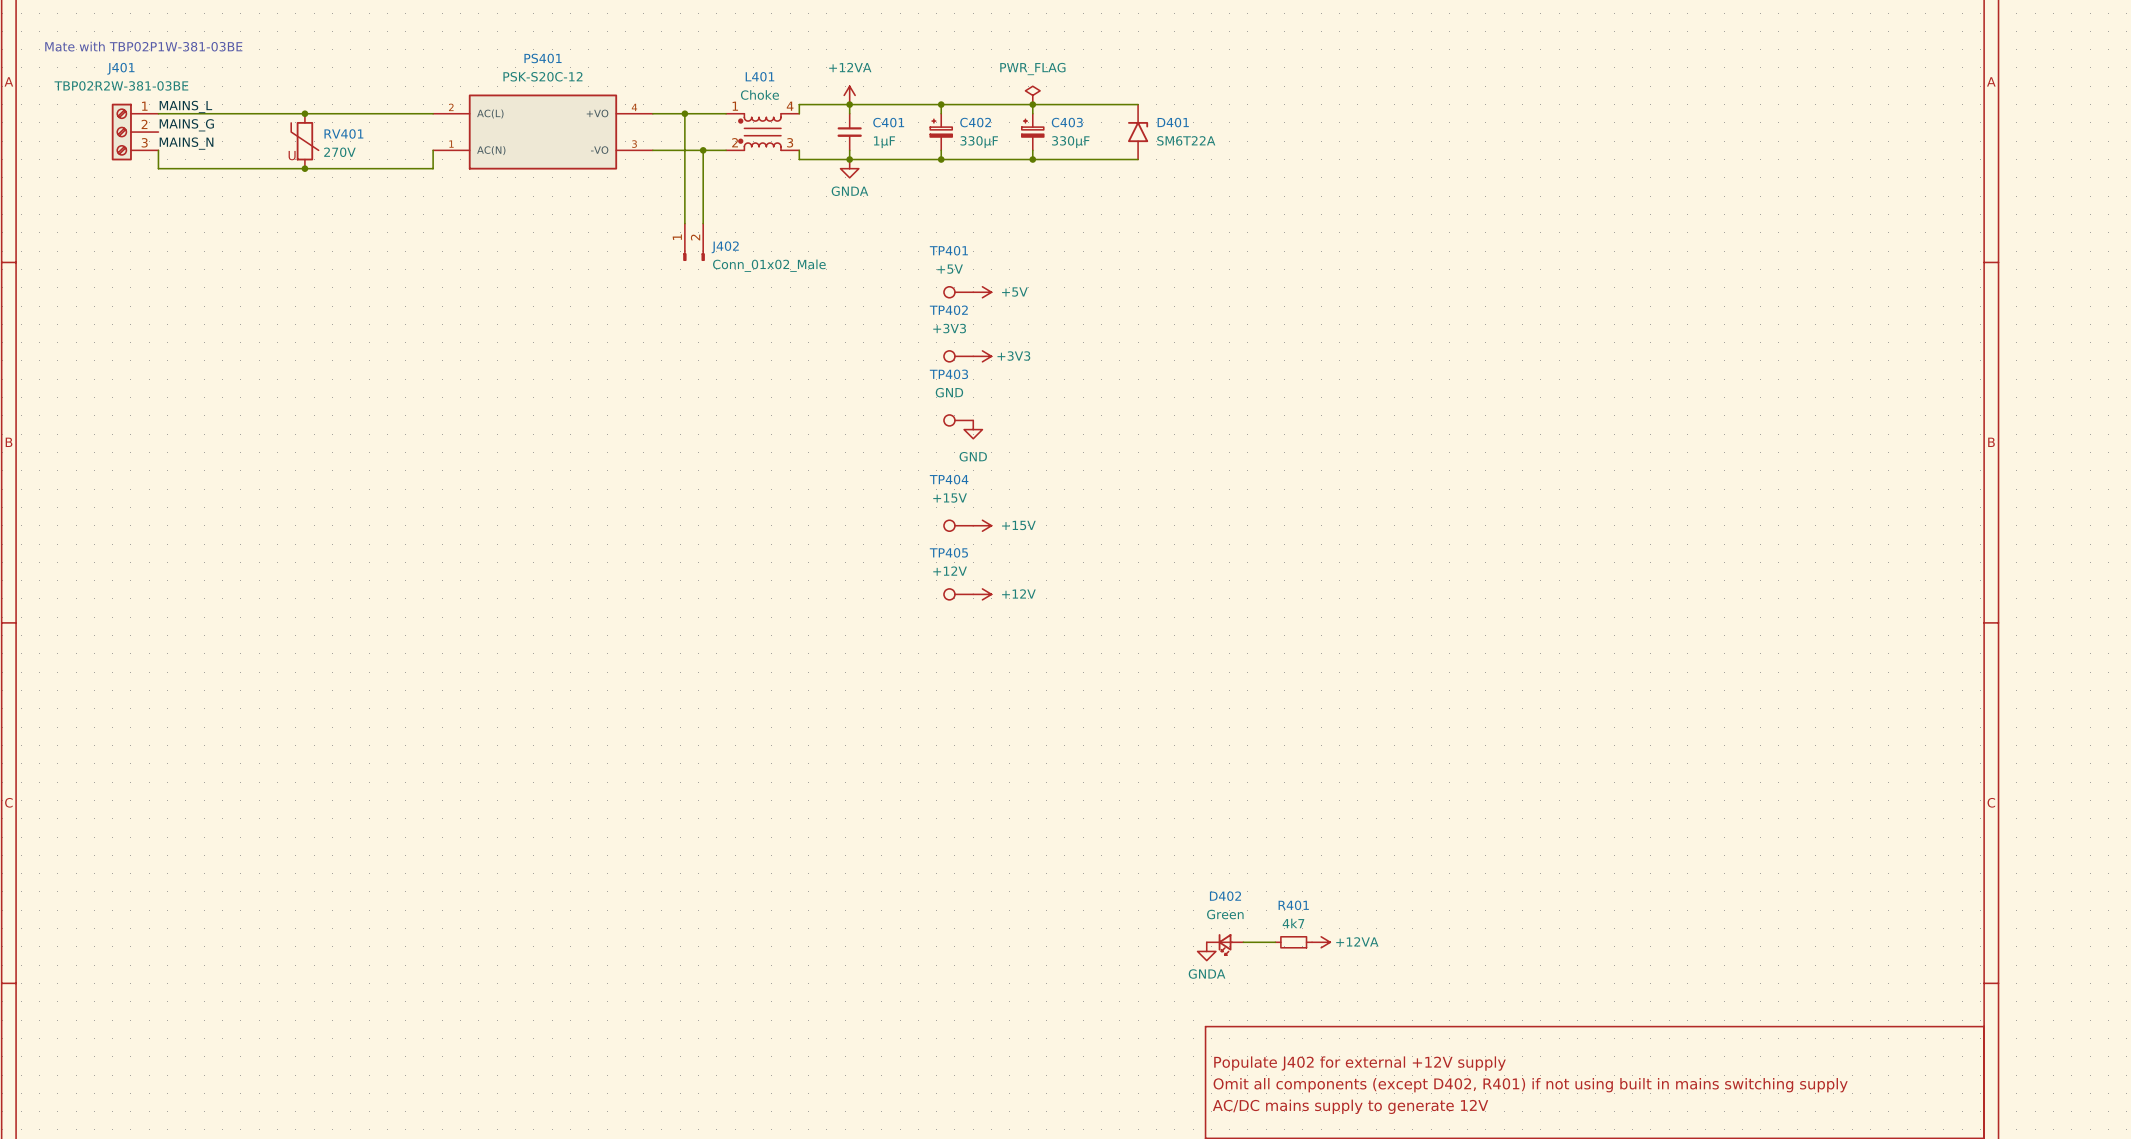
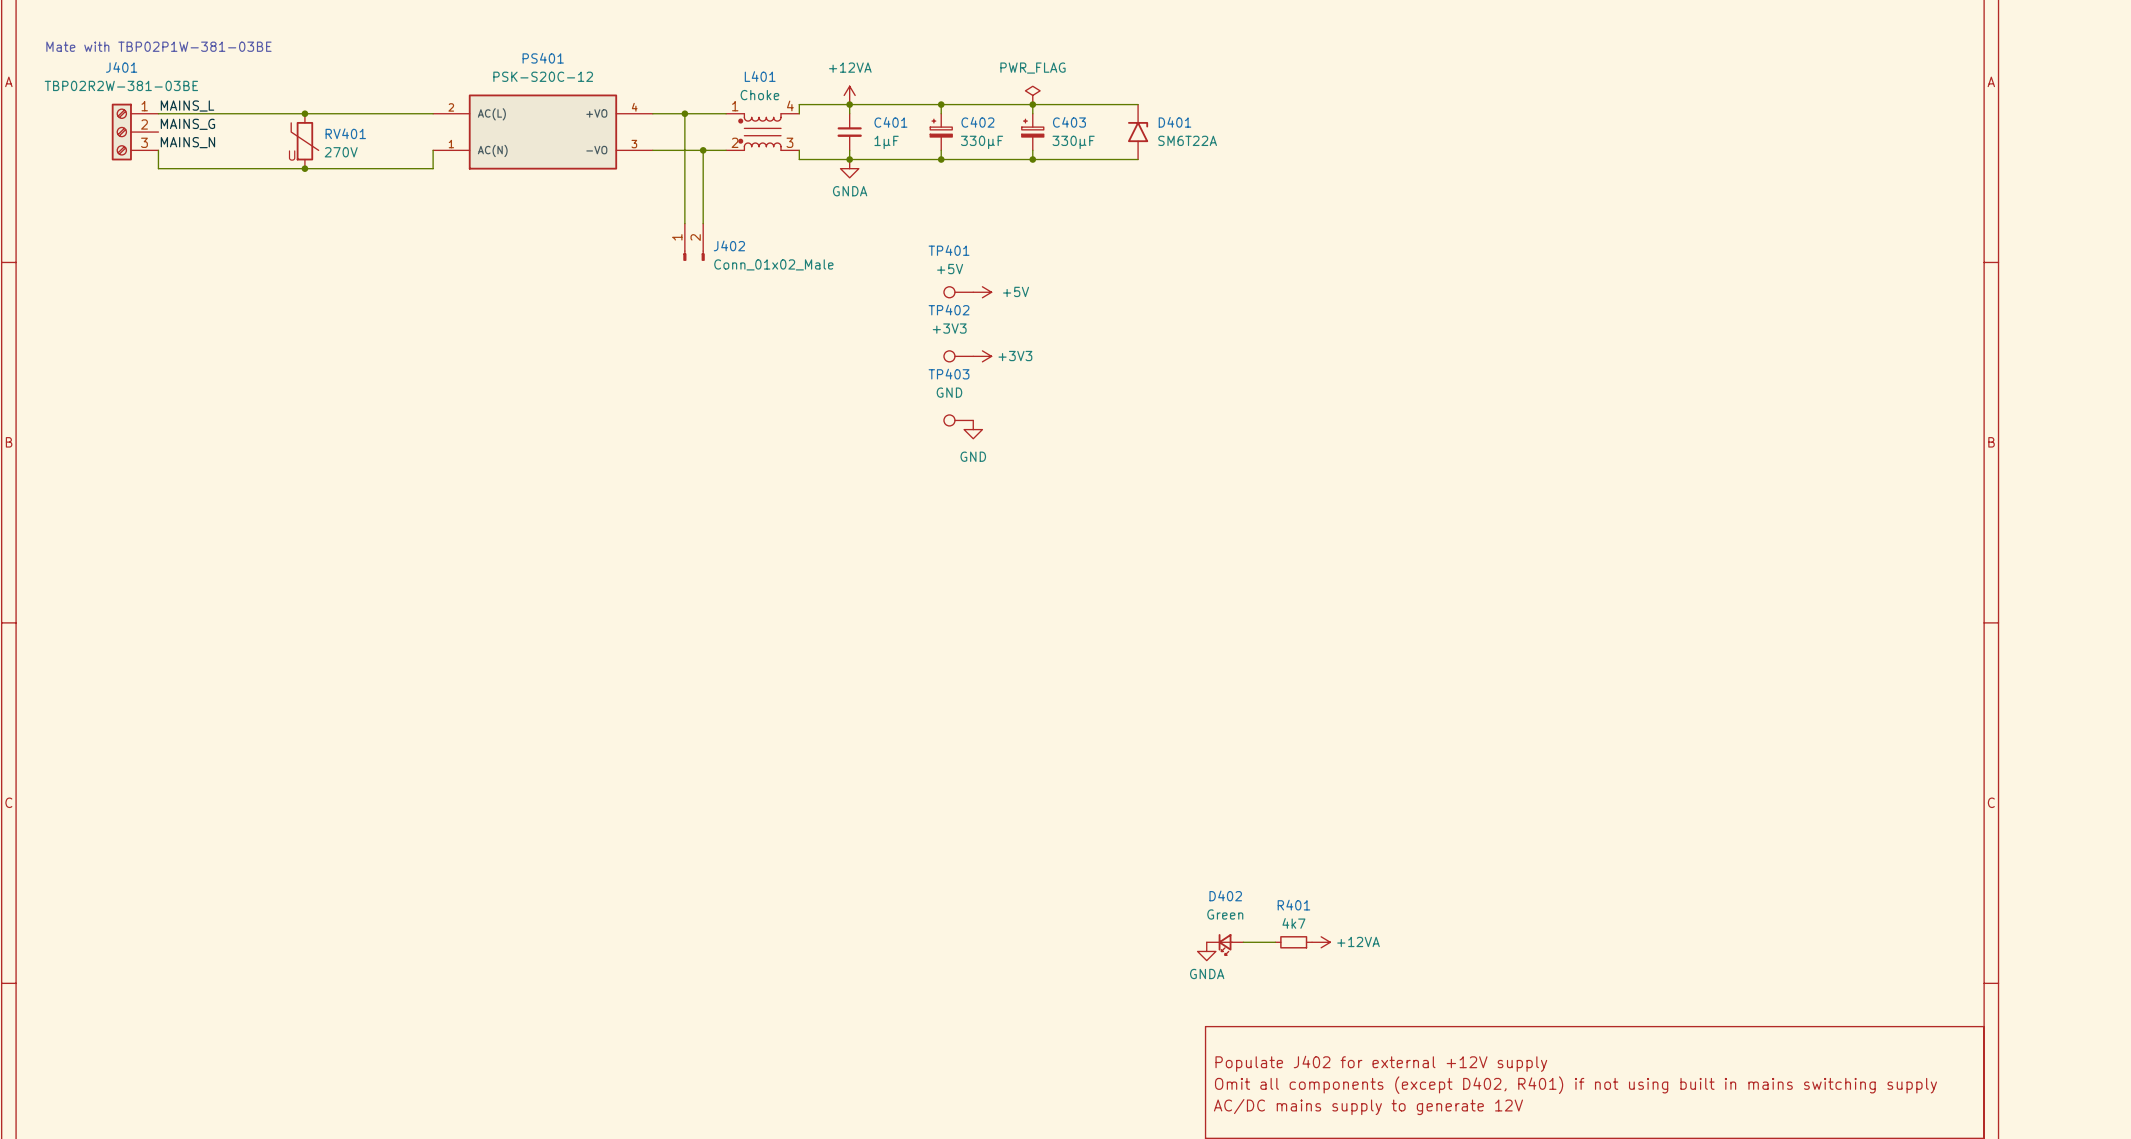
TP404: +15V (958, 525) -> none
power symbol: +15V (982, 525) -> none
TP405: +12V (958, 594) -> none
power symbol: +12V (982, 594) -> none

